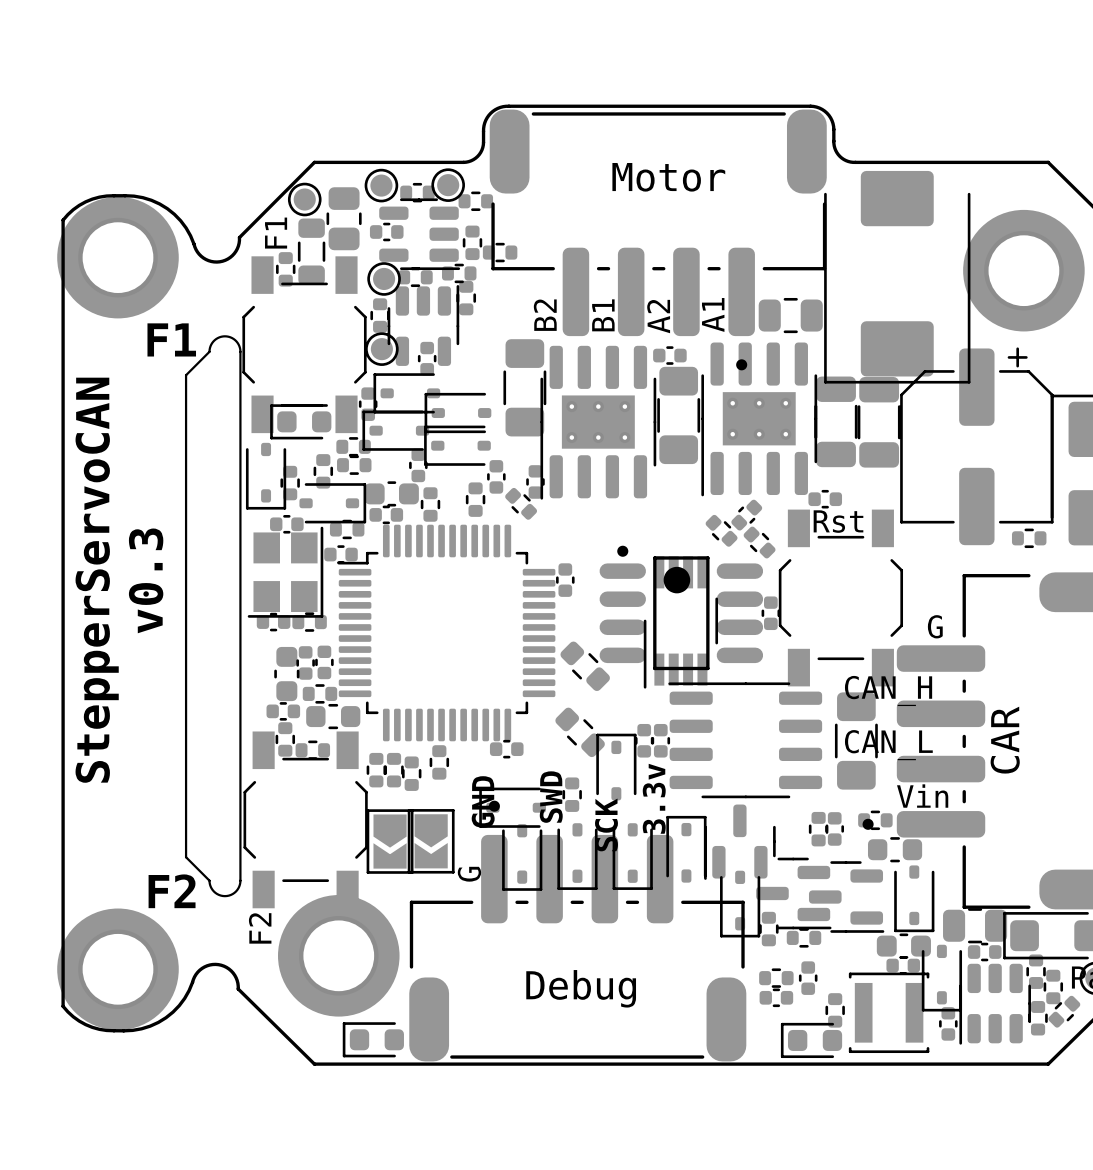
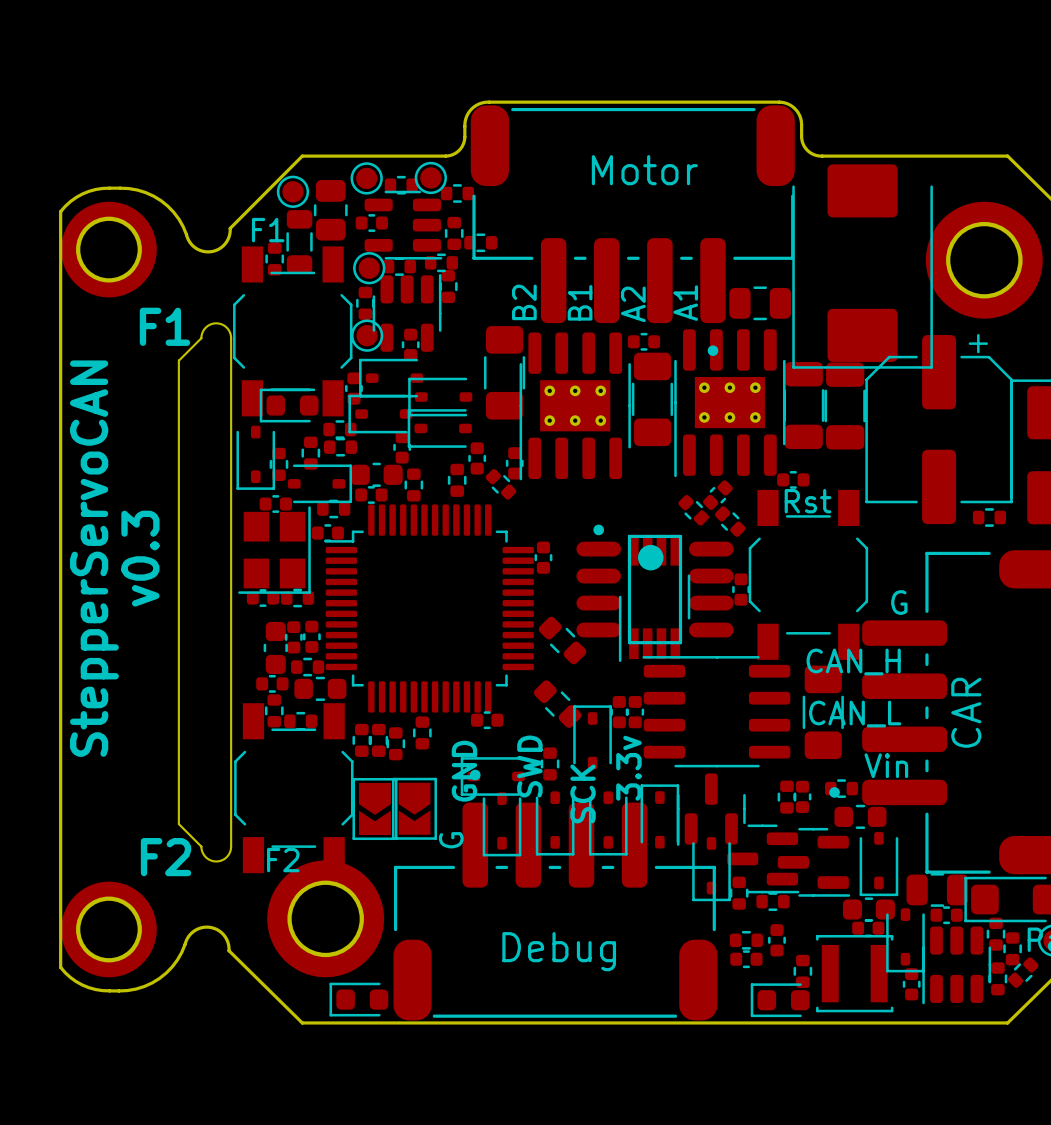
part footprint: [57, 196, 179, 319] -> [61, 201, 157, 298]
text rotation: 0° (276, 233) -> 90° clockwise (268, 230)
part footprint: [57, 908, 179, 1031] -> [61, 881, 157, 978]
text rotation: 0° (260, 928) -> 90° clockwise (283, 860)

